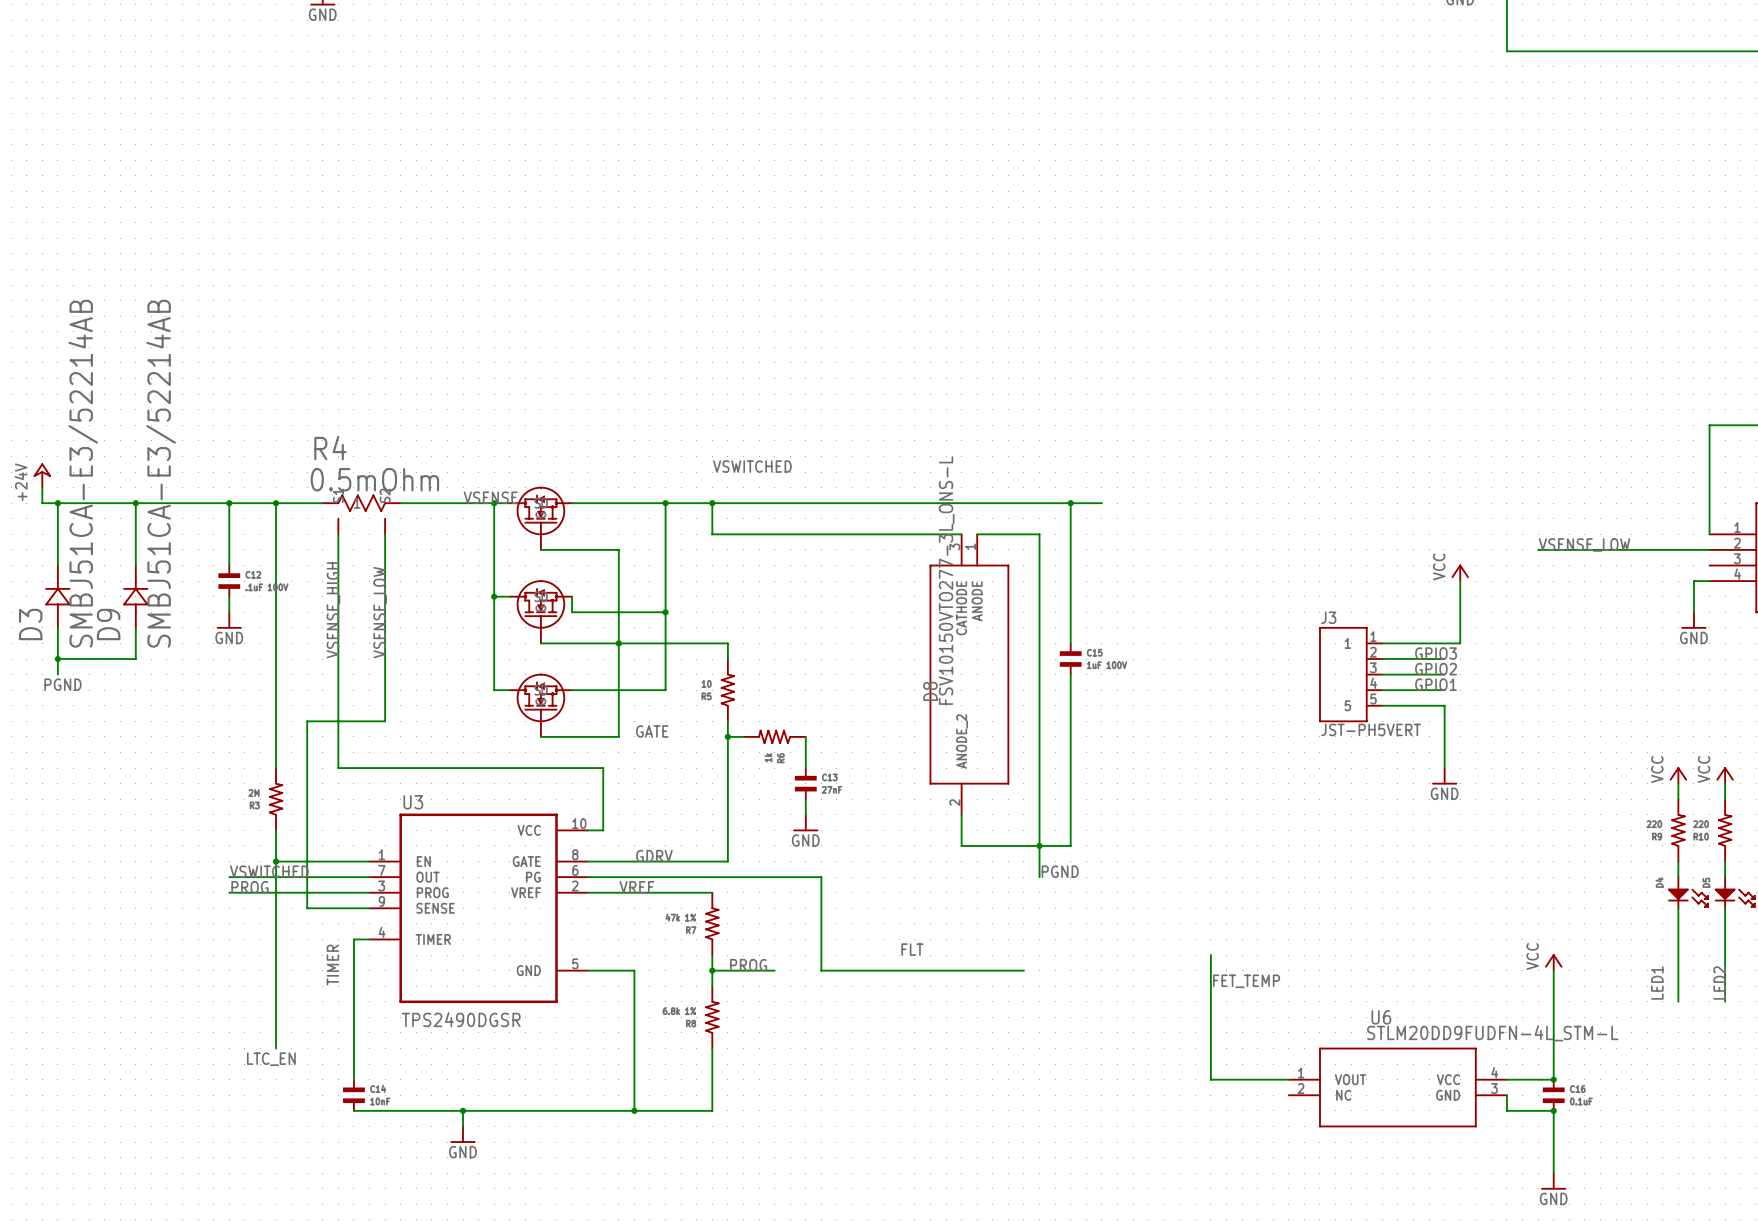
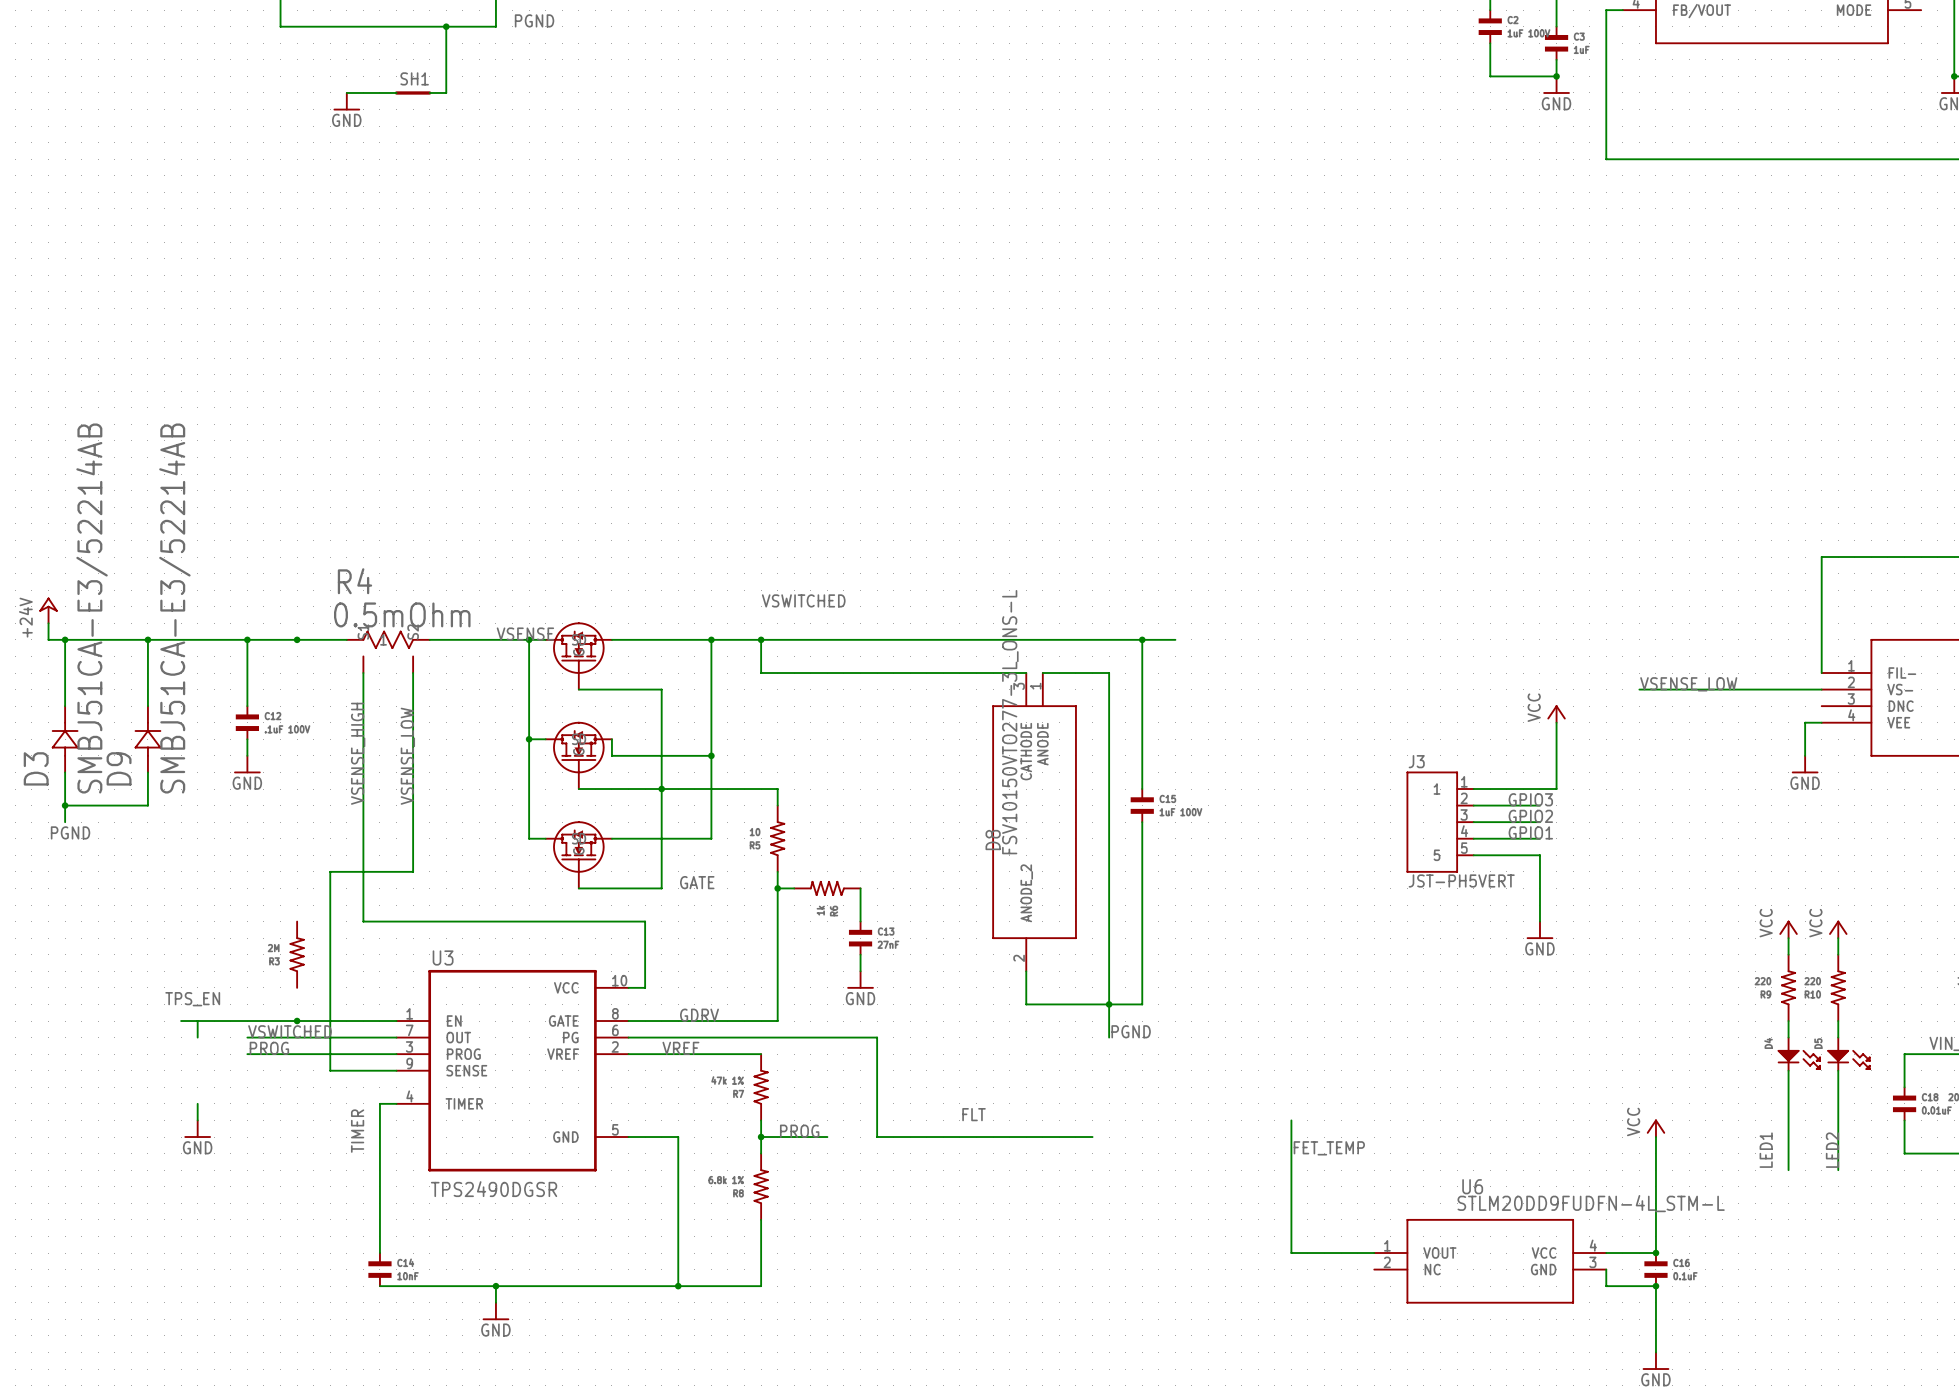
wire: (276, 503) (276, 768) -> none
wire: (276, 830) (276, 1048) -> none
label: none -> TPS_EN (192, 999)
wire: none -> (181, 1021) (297, 1021)
wire: none -> (197, 1021) (197, 1037)
wire: none -> (197, 1103) (197, 1120)
power symbol: none -> GND (197, 1129)
label: LTC_EN (271, 1059) -> none

